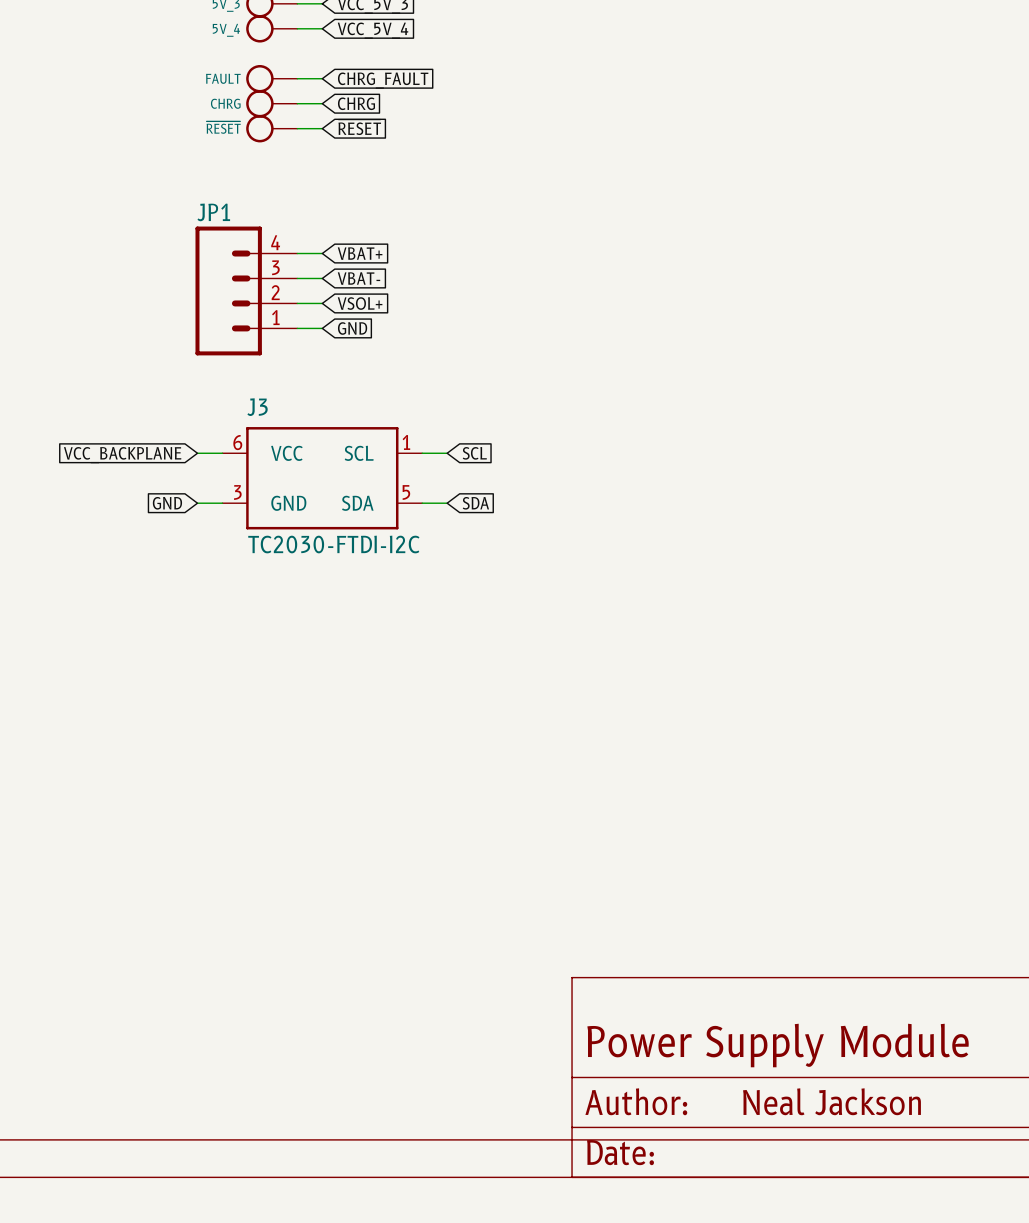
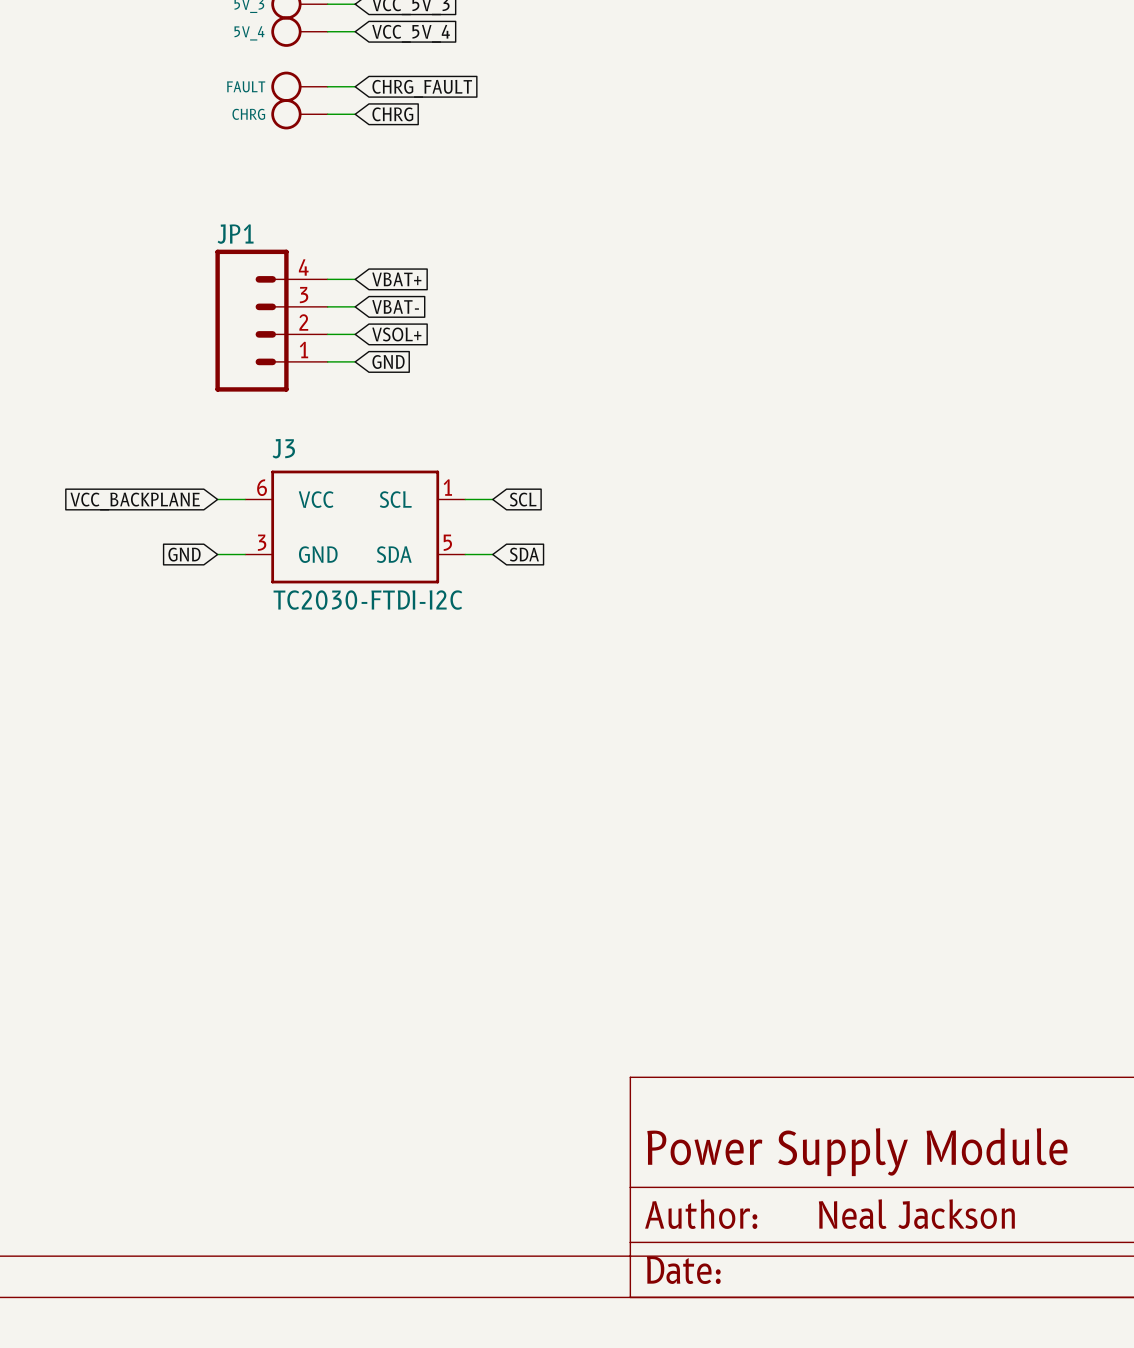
global label: ~{RESET} (359, 127) -> none
~{RESET}: (271, 128) -> none
wire: (297, 128) (322, 128) -> none

